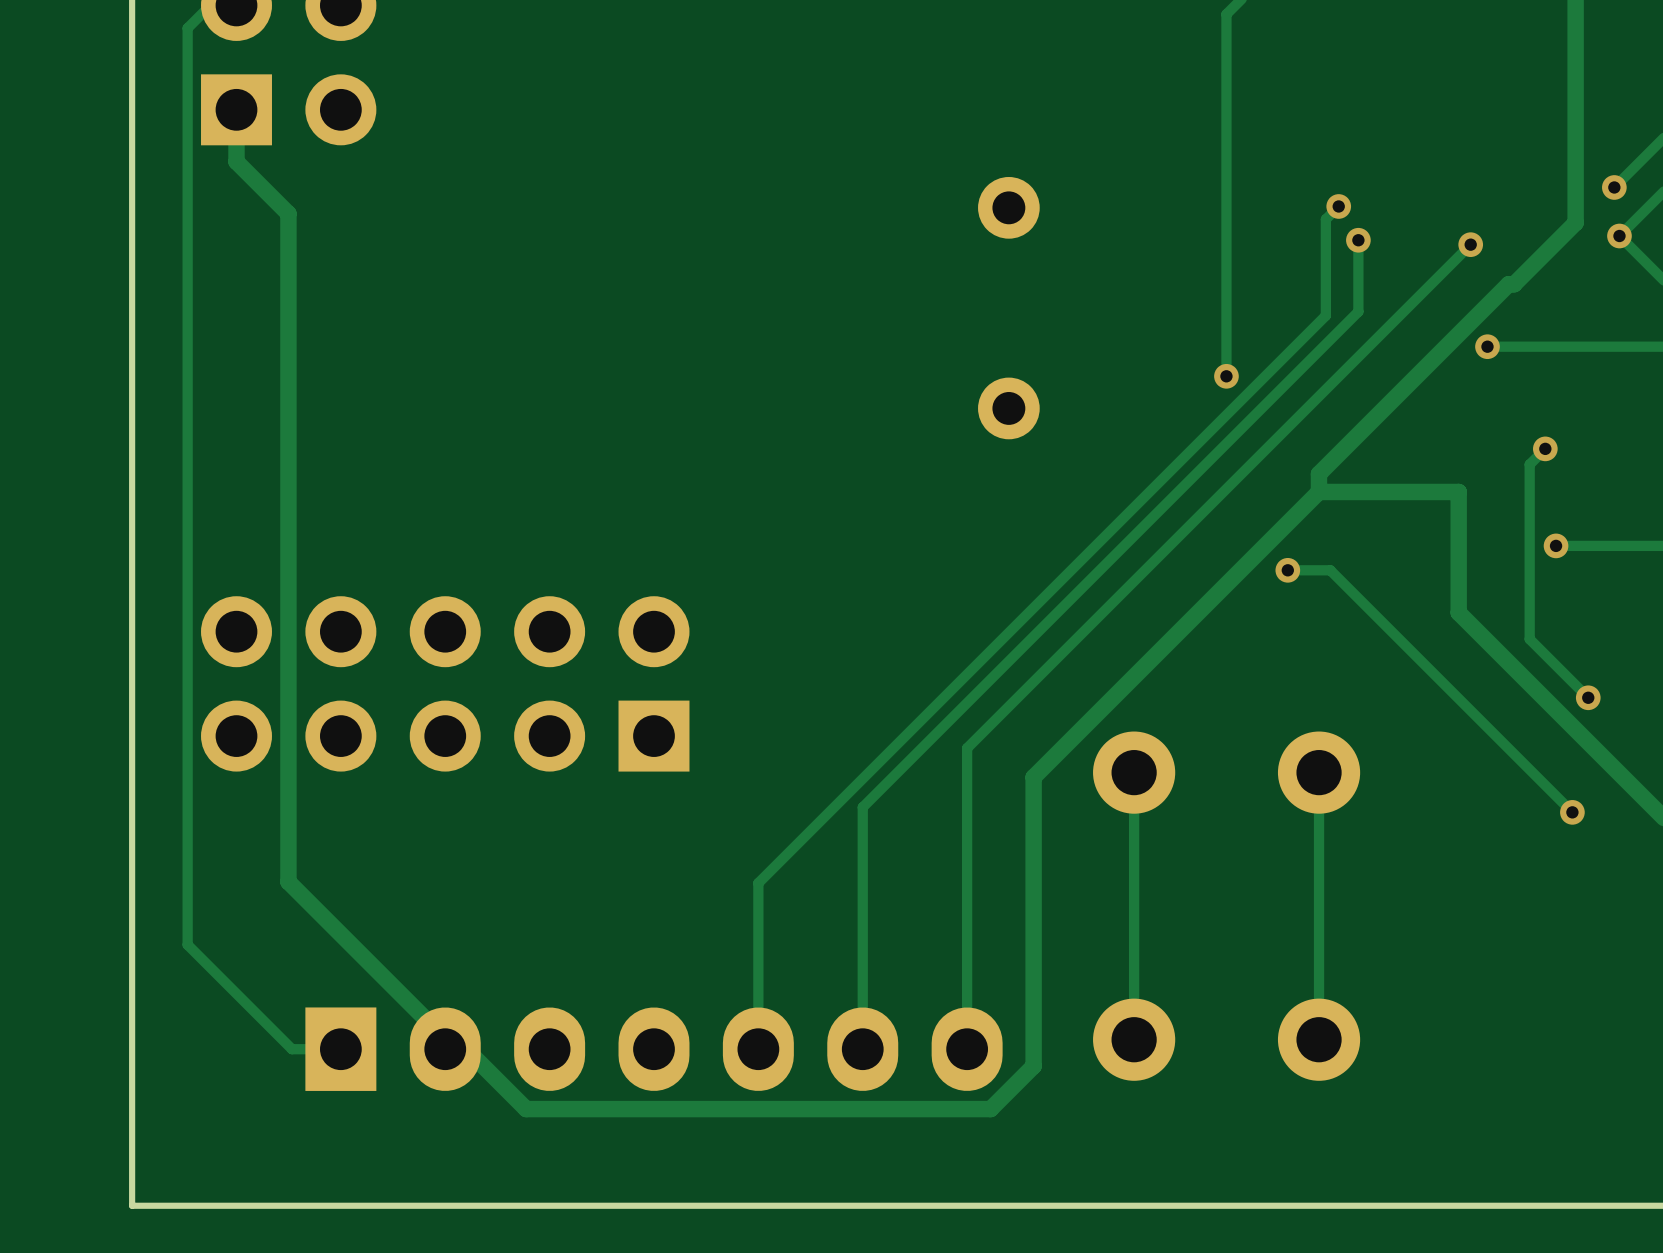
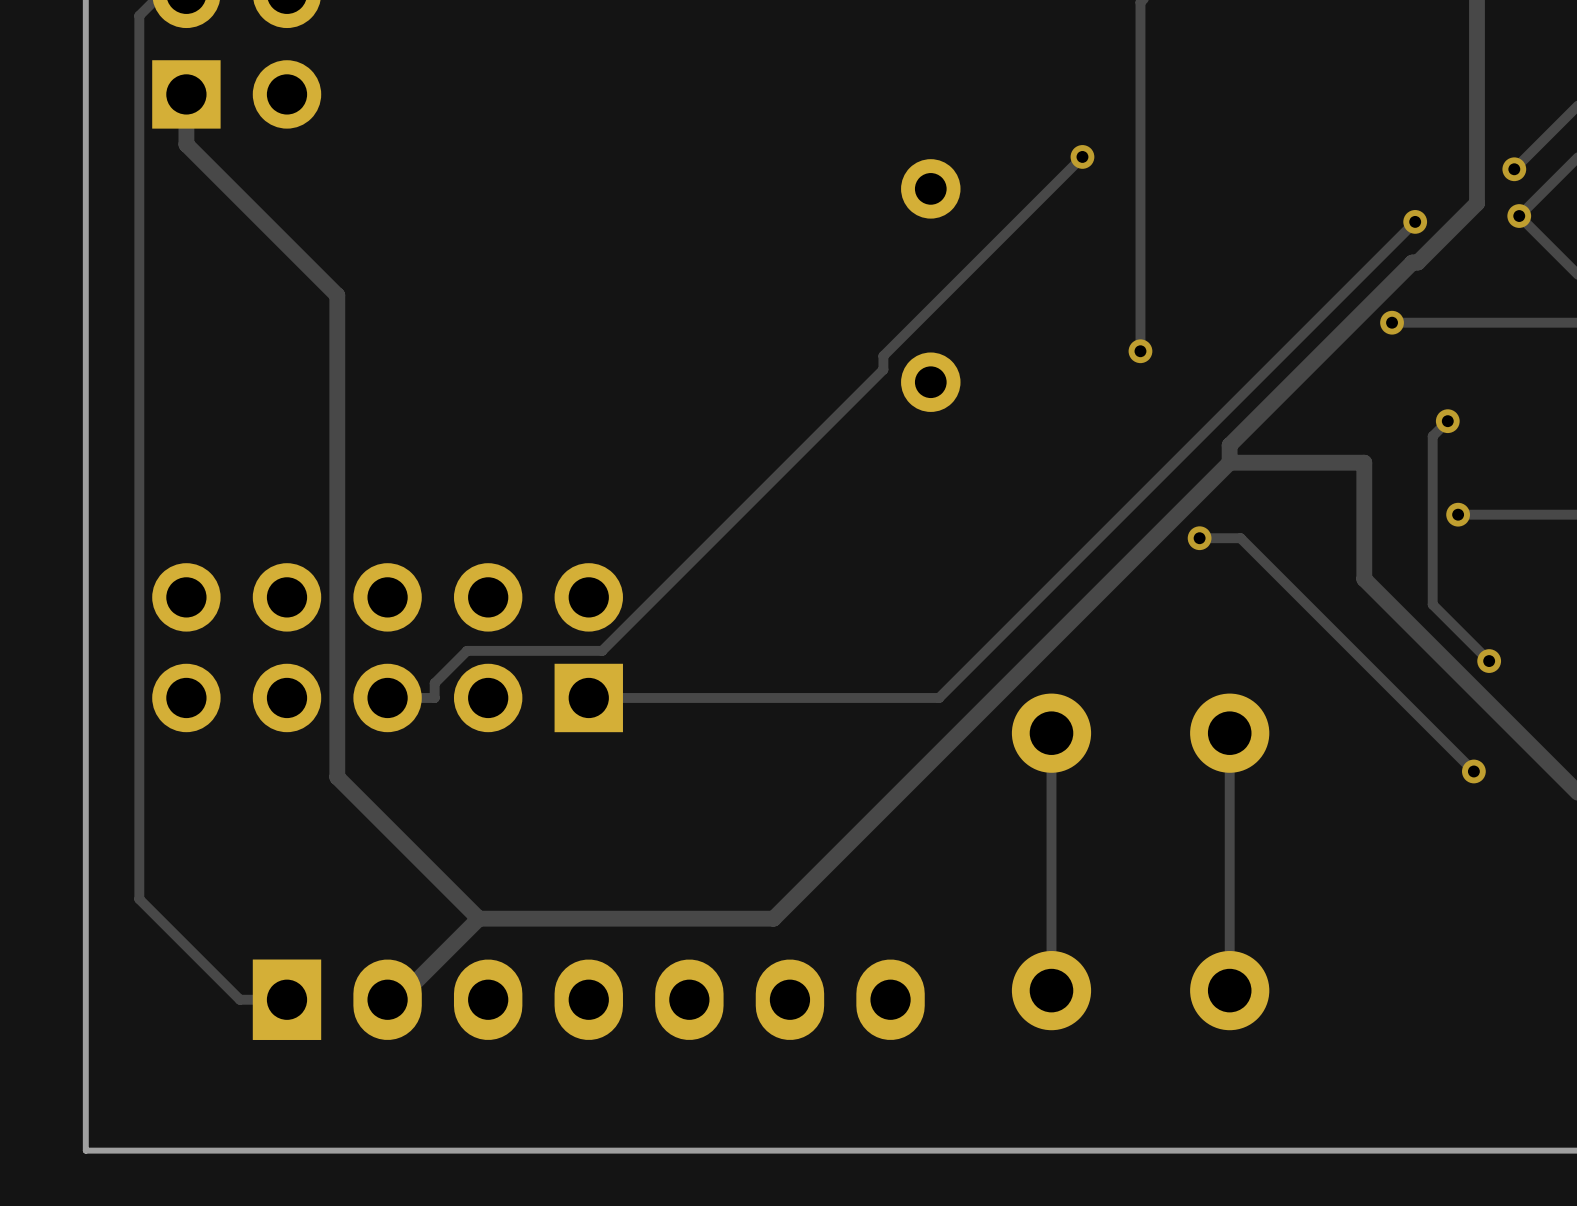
track: none -> (1082, 156) (883, 356) (883, 369) (602, 650) (467, 650) (434, 683) (434, 697) (387, 697)
via: none -> (1082, 156)
track: (1338, 206) (1325, 219) (1325, 315) (758, 883) (758, 1049) -> none
via: (1338, 206) -> none
track: (288, 213) (288, 881) (455, 1049) -> (236, 194) (337, 295) (337, 777) (478, 918)
track: (1358, 240) (1358, 311) (862, 807) (862, 1049) -> none
via: (1358, 240) -> none
track: none -> (1415, 221) (939, 697) (588, 697)
track: (1470, 244) (967, 748) (967, 1049) -> none
via position: (1470, 244) -> (1415, 221)
track: (1033, 777) (1033, 1066) (990, 1109) (526, 1109) (466, 1049) -> (954, 737) (773, 918) (478, 918)
track: none -> (478, 918) (397, 999)

